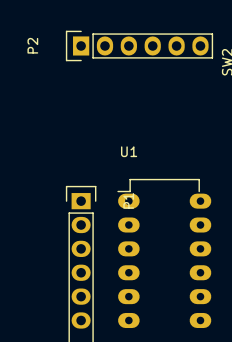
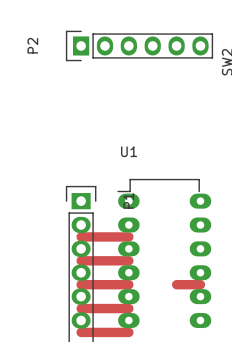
track: none -> (81, 236) (128, 236)
track: none -> (81, 260) (128, 260)
track: none -> (81, 284) (128, 284)
track: none -> (176, 284) (200, 284)
track: none -> (81, 308) (128, 308)
track: none -> (81, 332) (128, 332)

